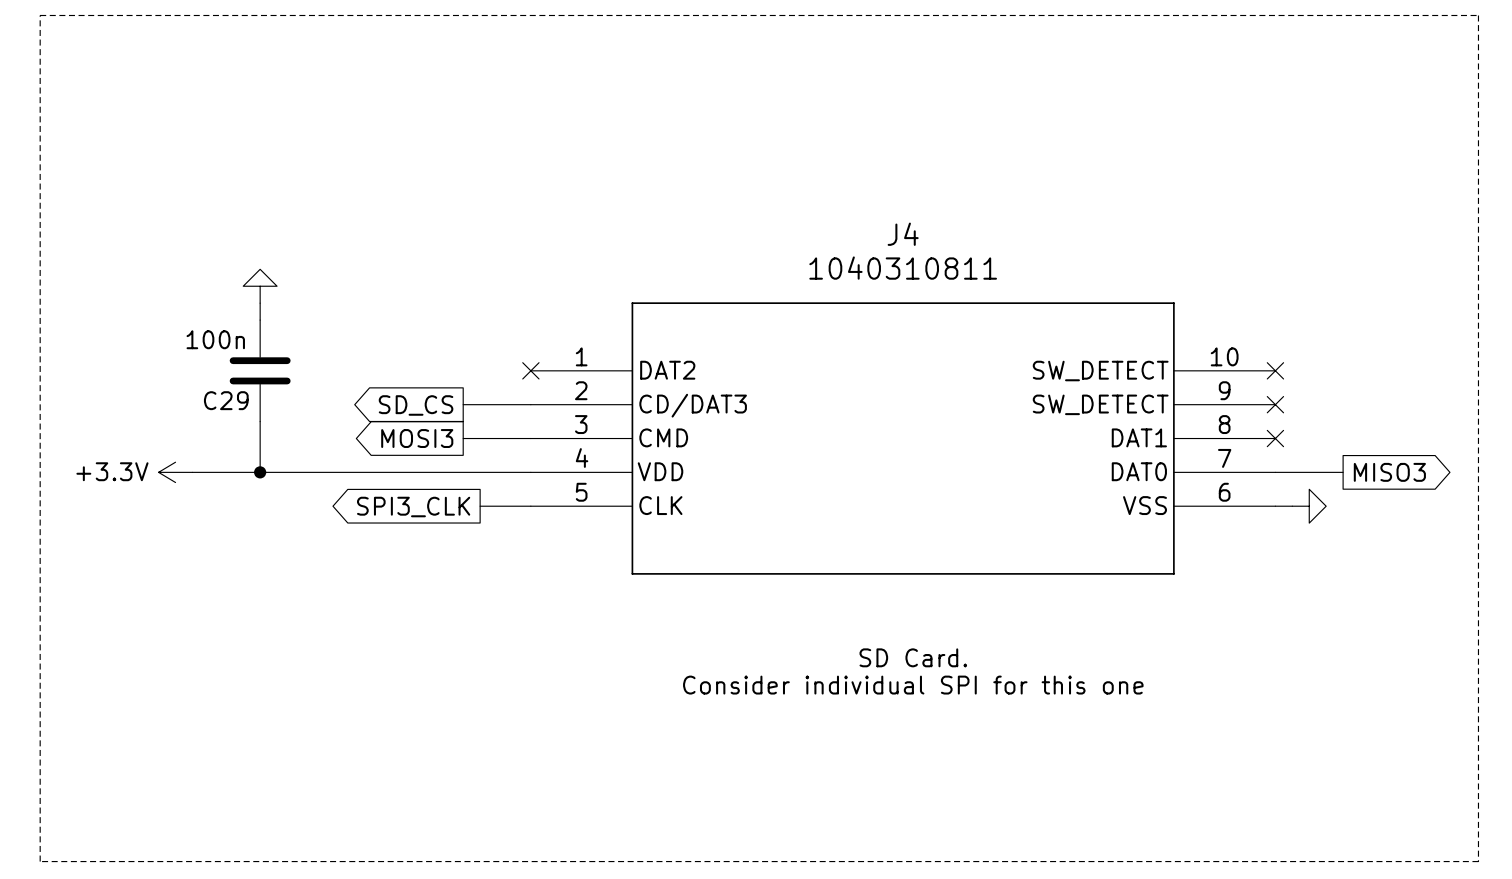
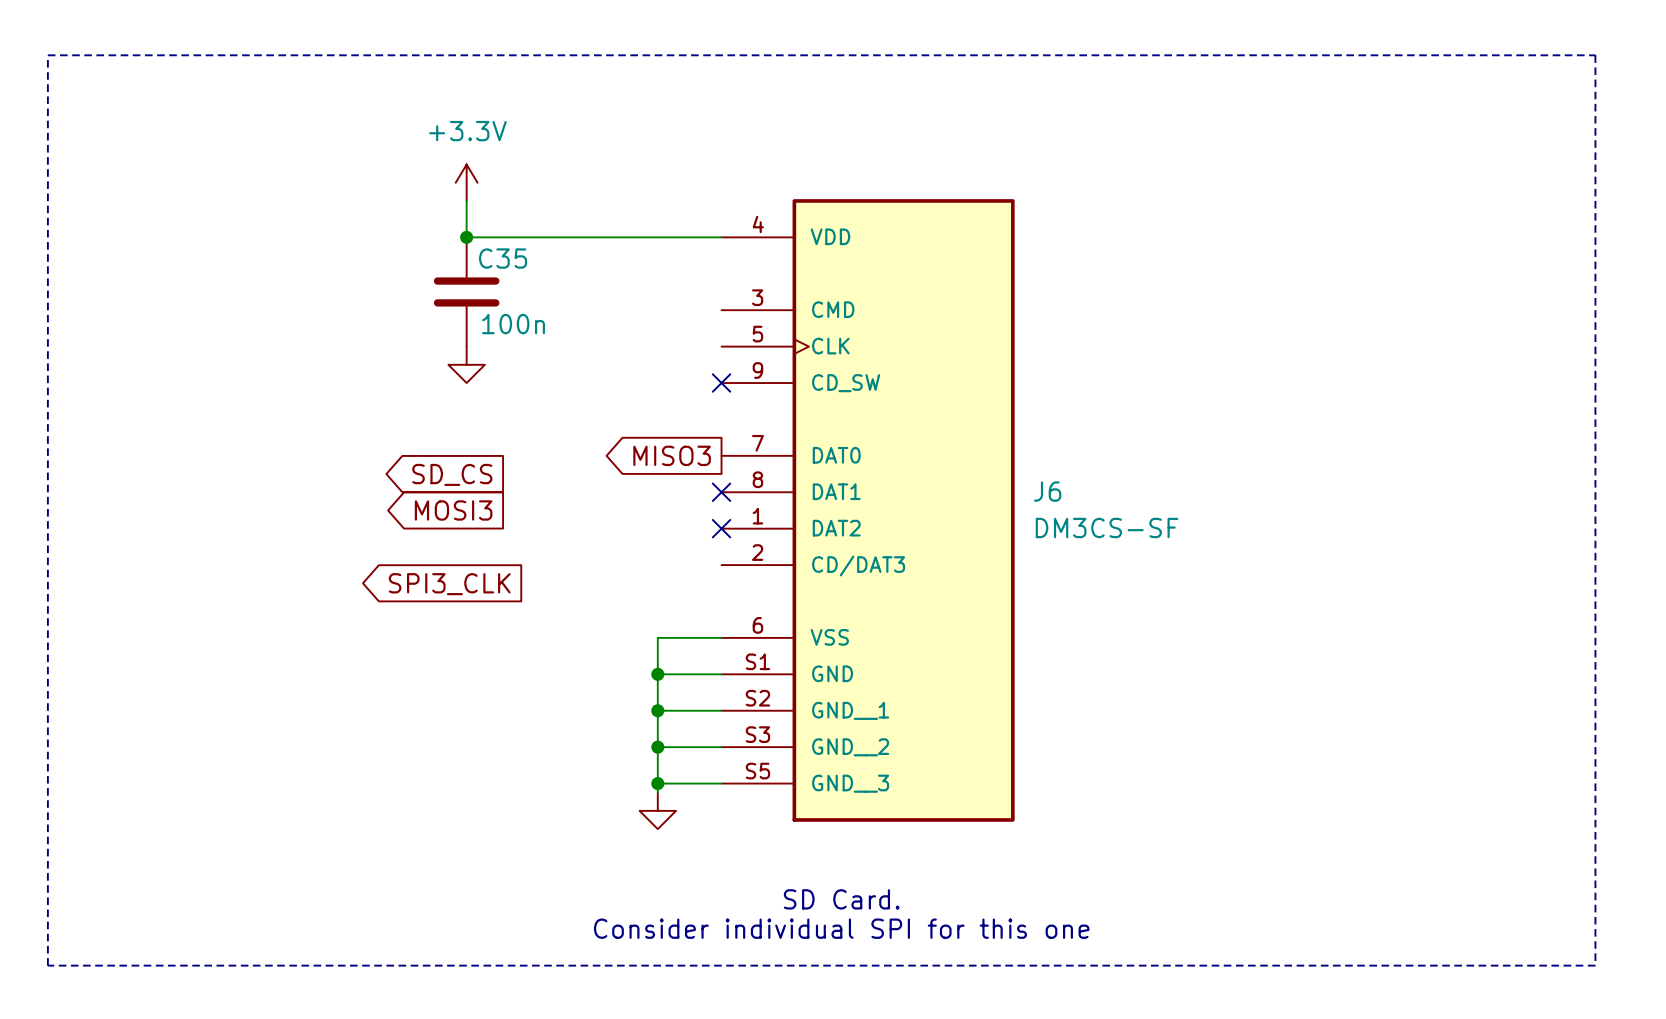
power symbol: none -> +3.3V (466, 182)
wire: none -> (466, 200) (466, 237) (721, 237)
junction: none -> (466, 237)
C35: none -> 100n (466, 291)
power symbol rotation: 0° (260, 286) -> 180° (466, 364)
power symbol position: (260, 286) -> (466, 364)
wire: (260, 303) (260, 320) -> none
no-connect mark: none -> (721, 383)
C29: 100n (260, 370) -> none
no-connect mark: (530, 370) -> none
no-connect mark: (1275, 370) -> none
global label: none -> MISO3 (672, 455)
wire: (463, 404) (530, 404) -> none
no-connect mark: (1275, 404) -> none
wire: (260, 421) (260, 472) -> none
no-connect mark: none -> (721, 492)
wire: (463, 438) (530, 438) -> none
J6: none -> DM3CS-SF (868, 510)
J4: 1040310811 (903, 438) -> none
no-connect mark: (1275, 438) -> none
no-connect mark: none -> (721, 528)
power symbol: +3.3V (175, 472) -> none
wire: (192, 472) (530, 472) -> none
junction: (260, 472) -> none
wire: (1275, 472) (1343, 472) -> none
global label: MISO3 (1389, 472) -> none
wire: (480, 506) (530, 506) -> none
wire: (1275, 506) (1292, 506) -> none
power symbol: (1309, 506) -> none
wire: none -> (721, 637) (657, 637) (657, 792)
wire: none -> (657, 674) (721, 674)
junction: none -> (657, 674)
wire: none -> (657, 710) (721, 710)
junction: none -> (657, 710)
text position: SD Card. (913, 657) -> SD Card. (841, 899)
wire: none -> (657, 747) (721, 747)
junction: none -> (657, 747)
text position: Consider individual SPI for this one (913, 685) -> Consider individual SPI for this one (841, 928)
wire: none -> (657, 783) (721, 783)
junction: none -> (657, 783)
power symbol: none -> (657, 810)

